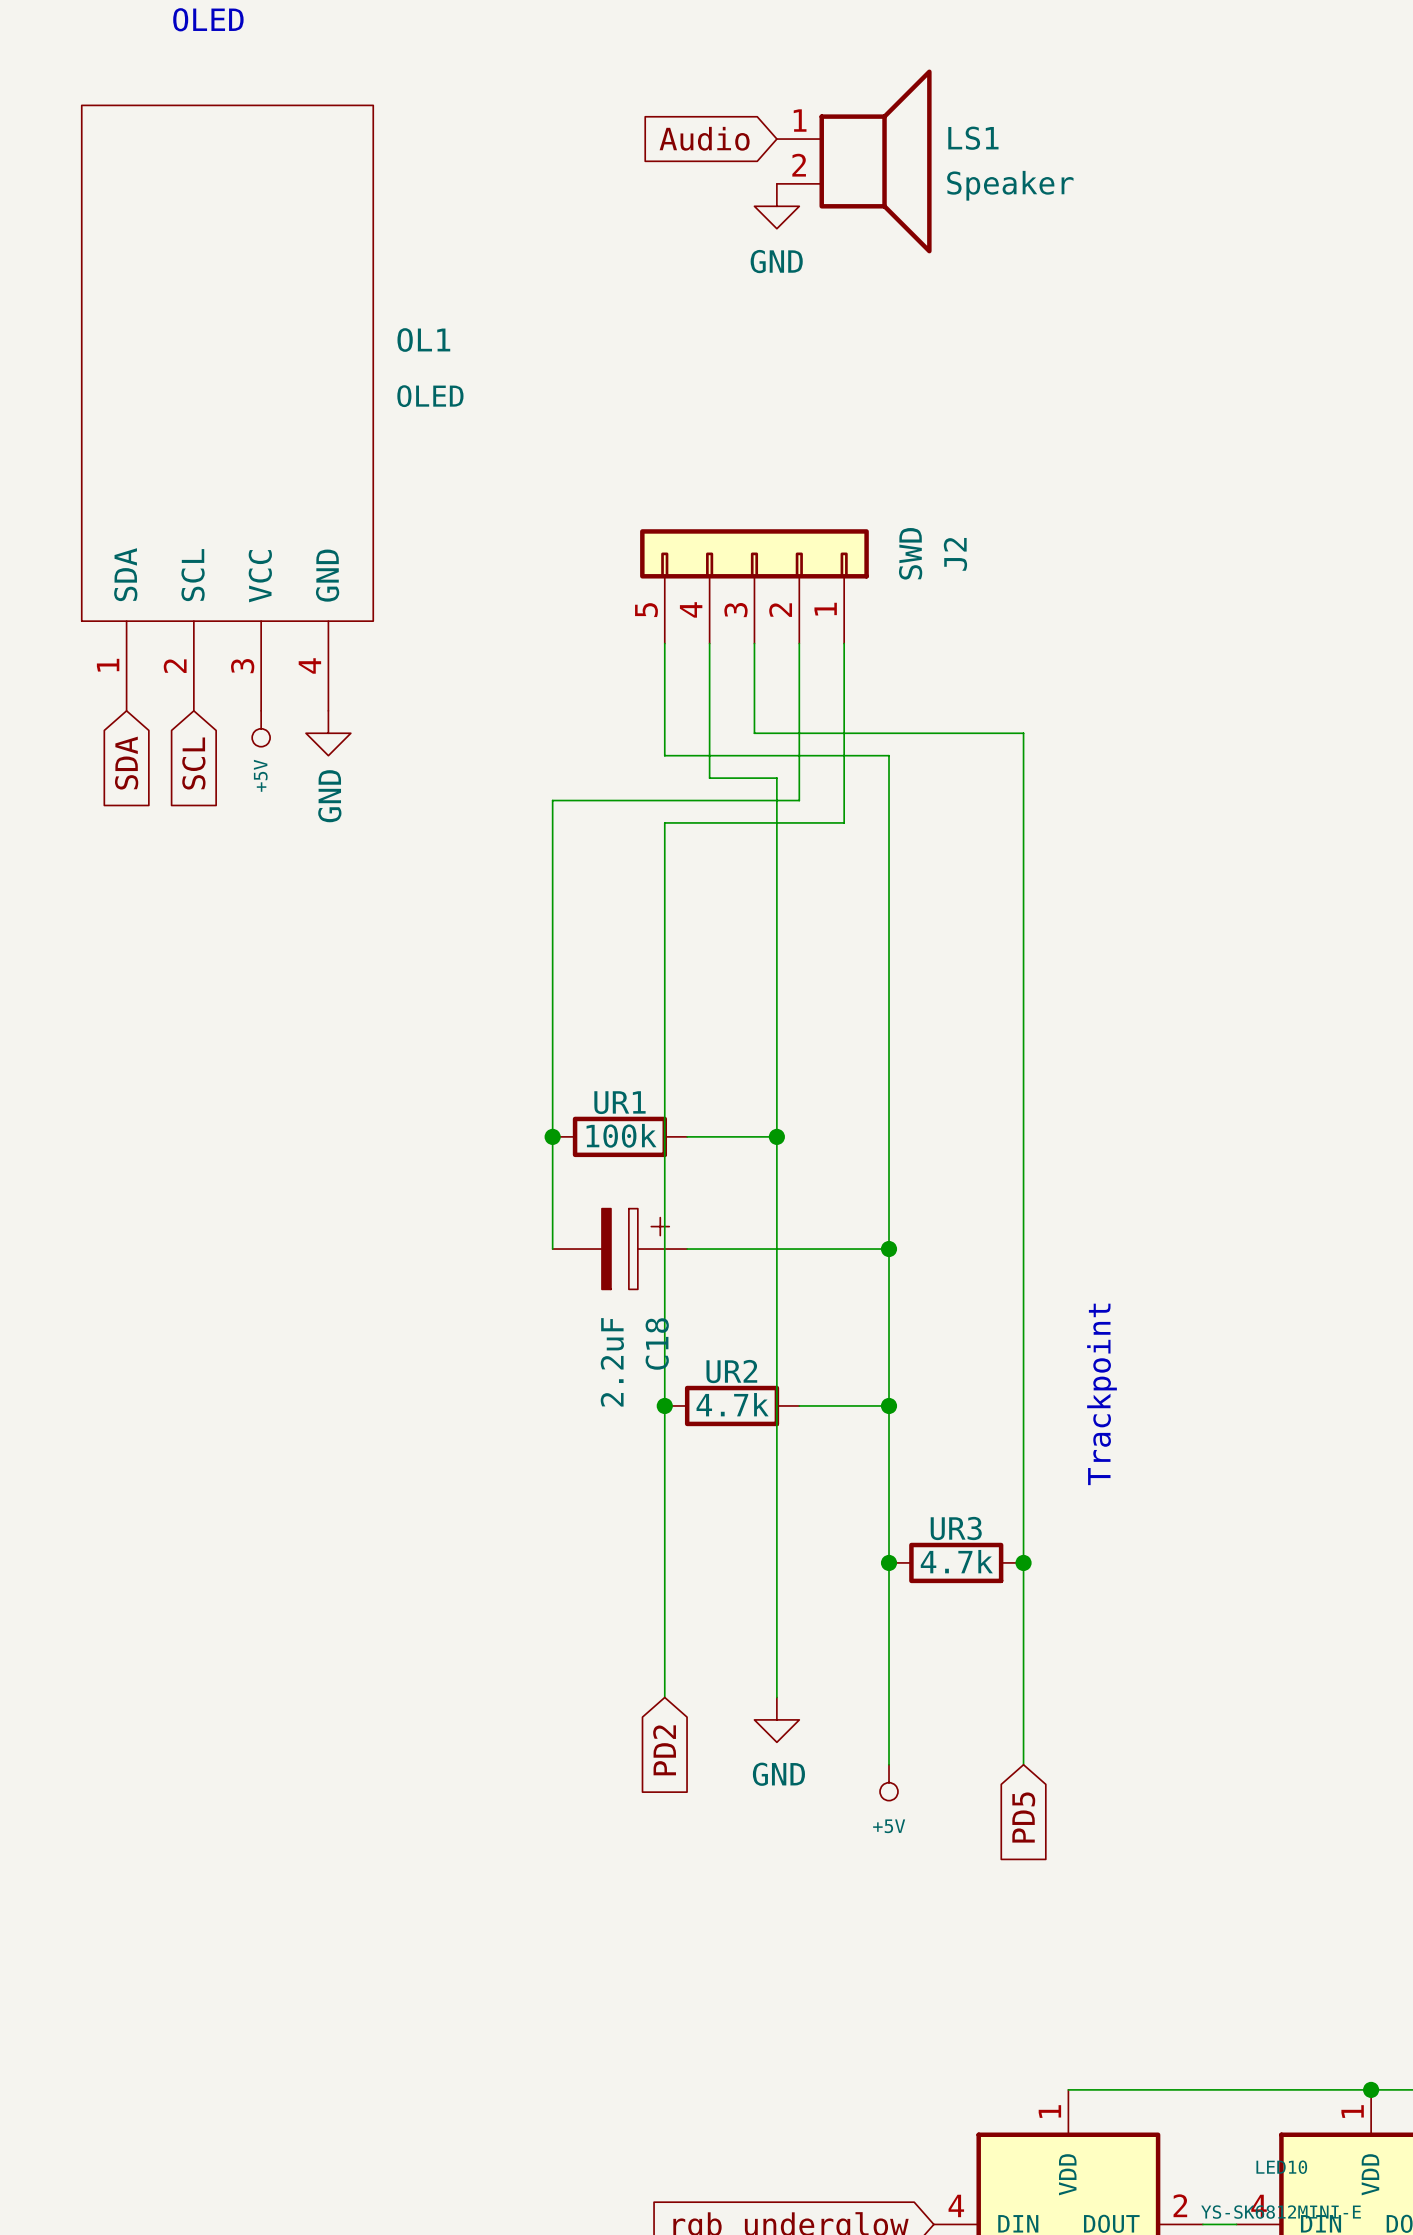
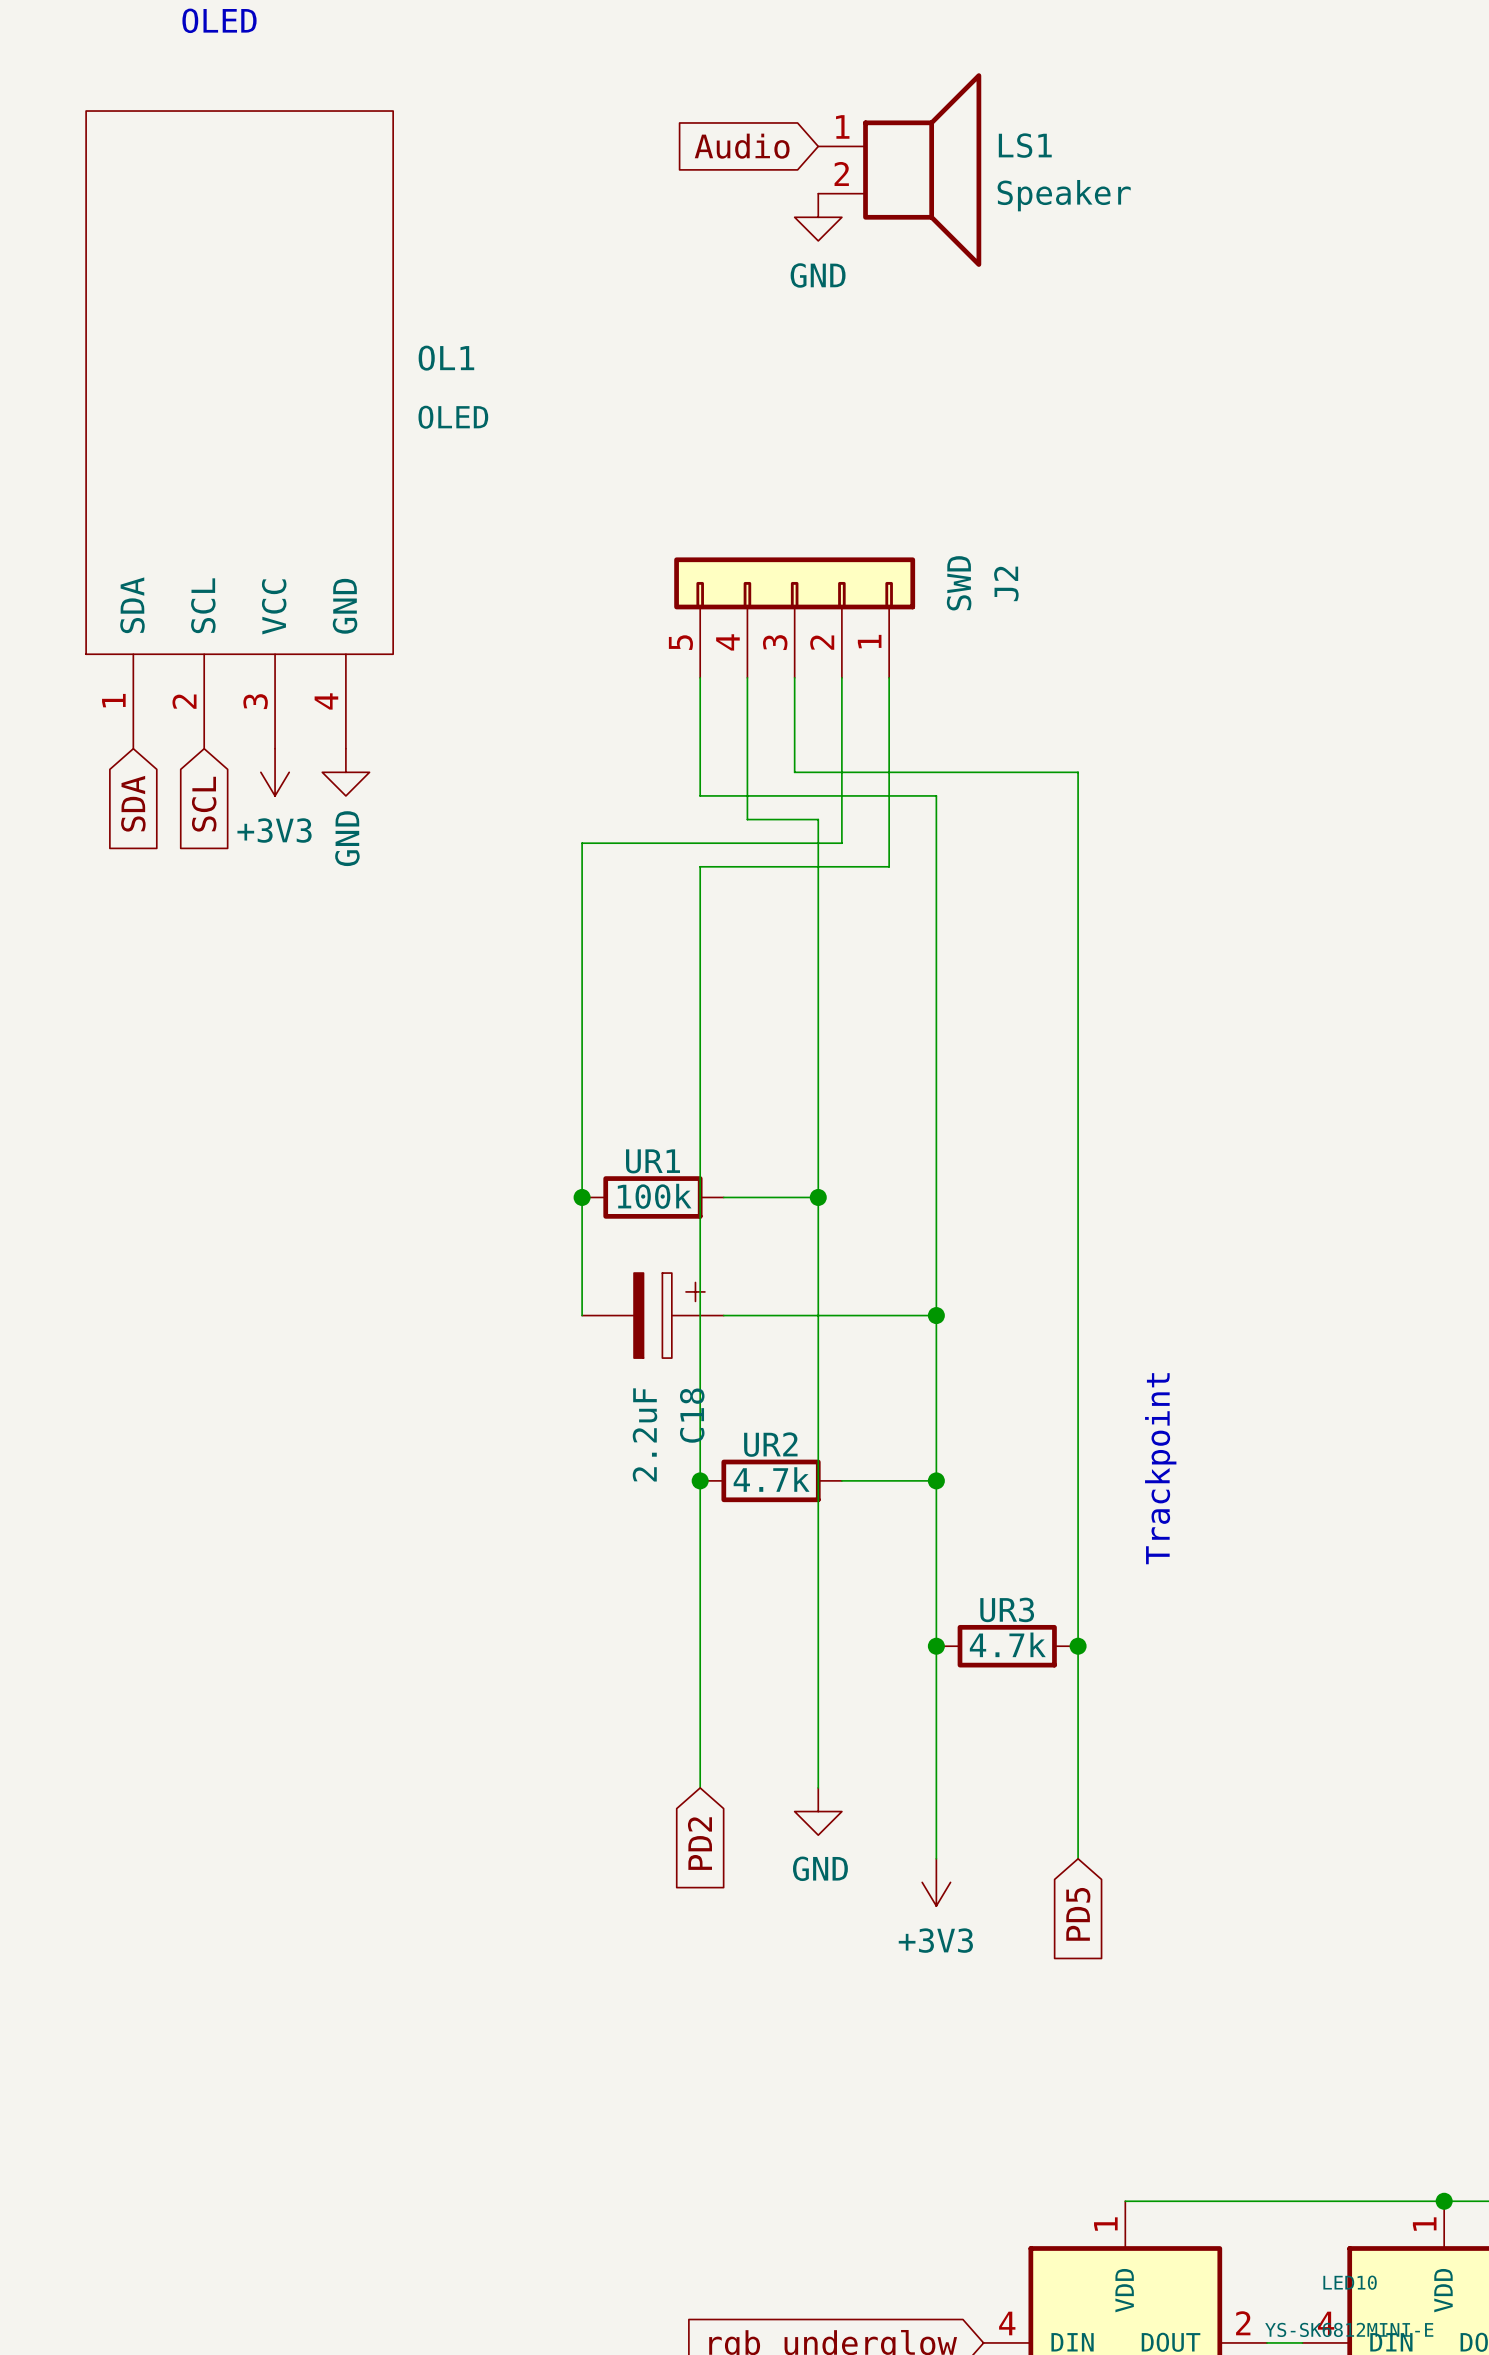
power symbol: +5V (261, 728) -> +3V3 (275, 772)
power symbol: +5V (889, 1782) -> +3V3 (936, 1882)

